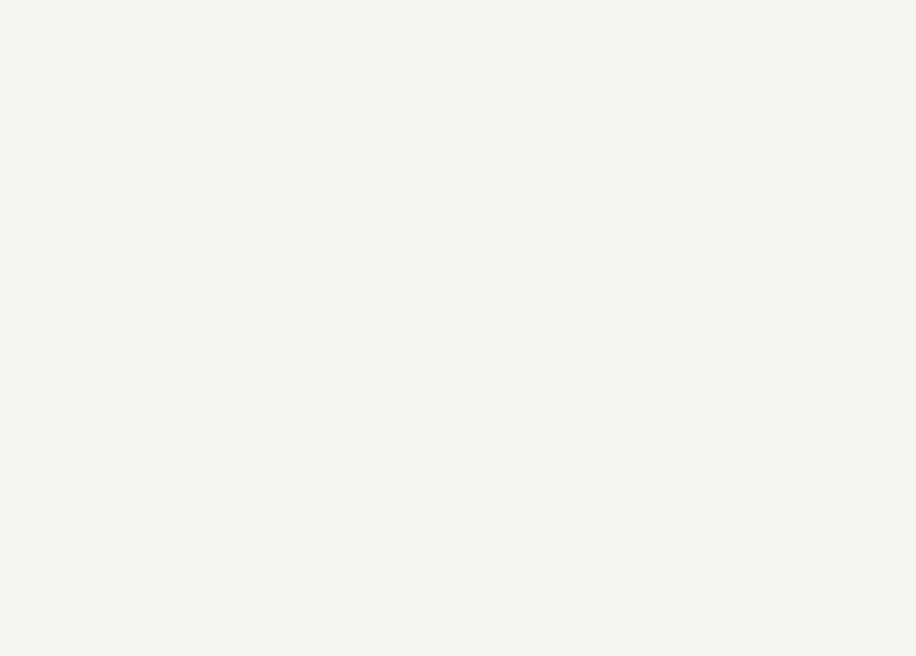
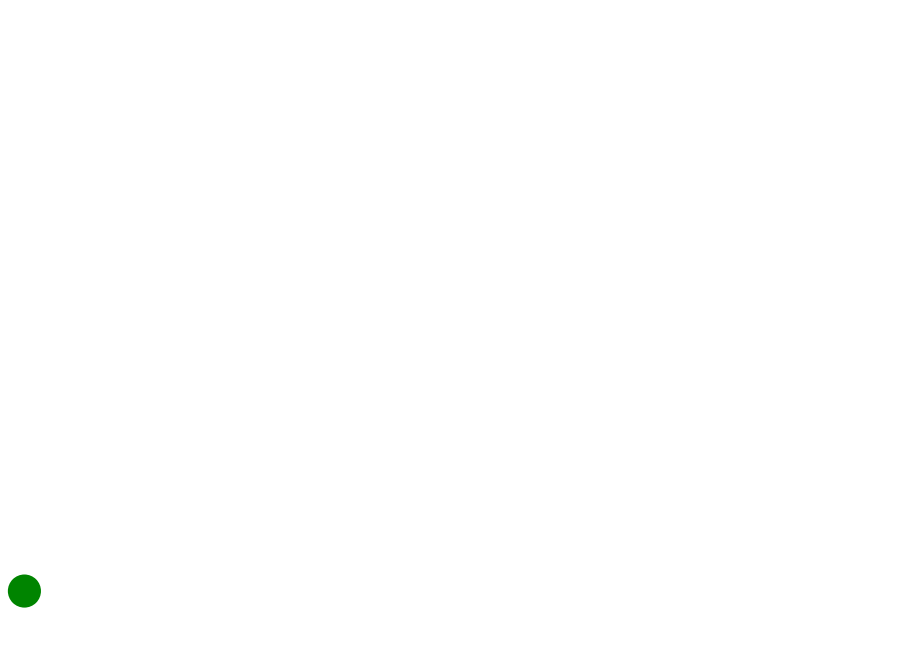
junction: none -> (24, 591)

